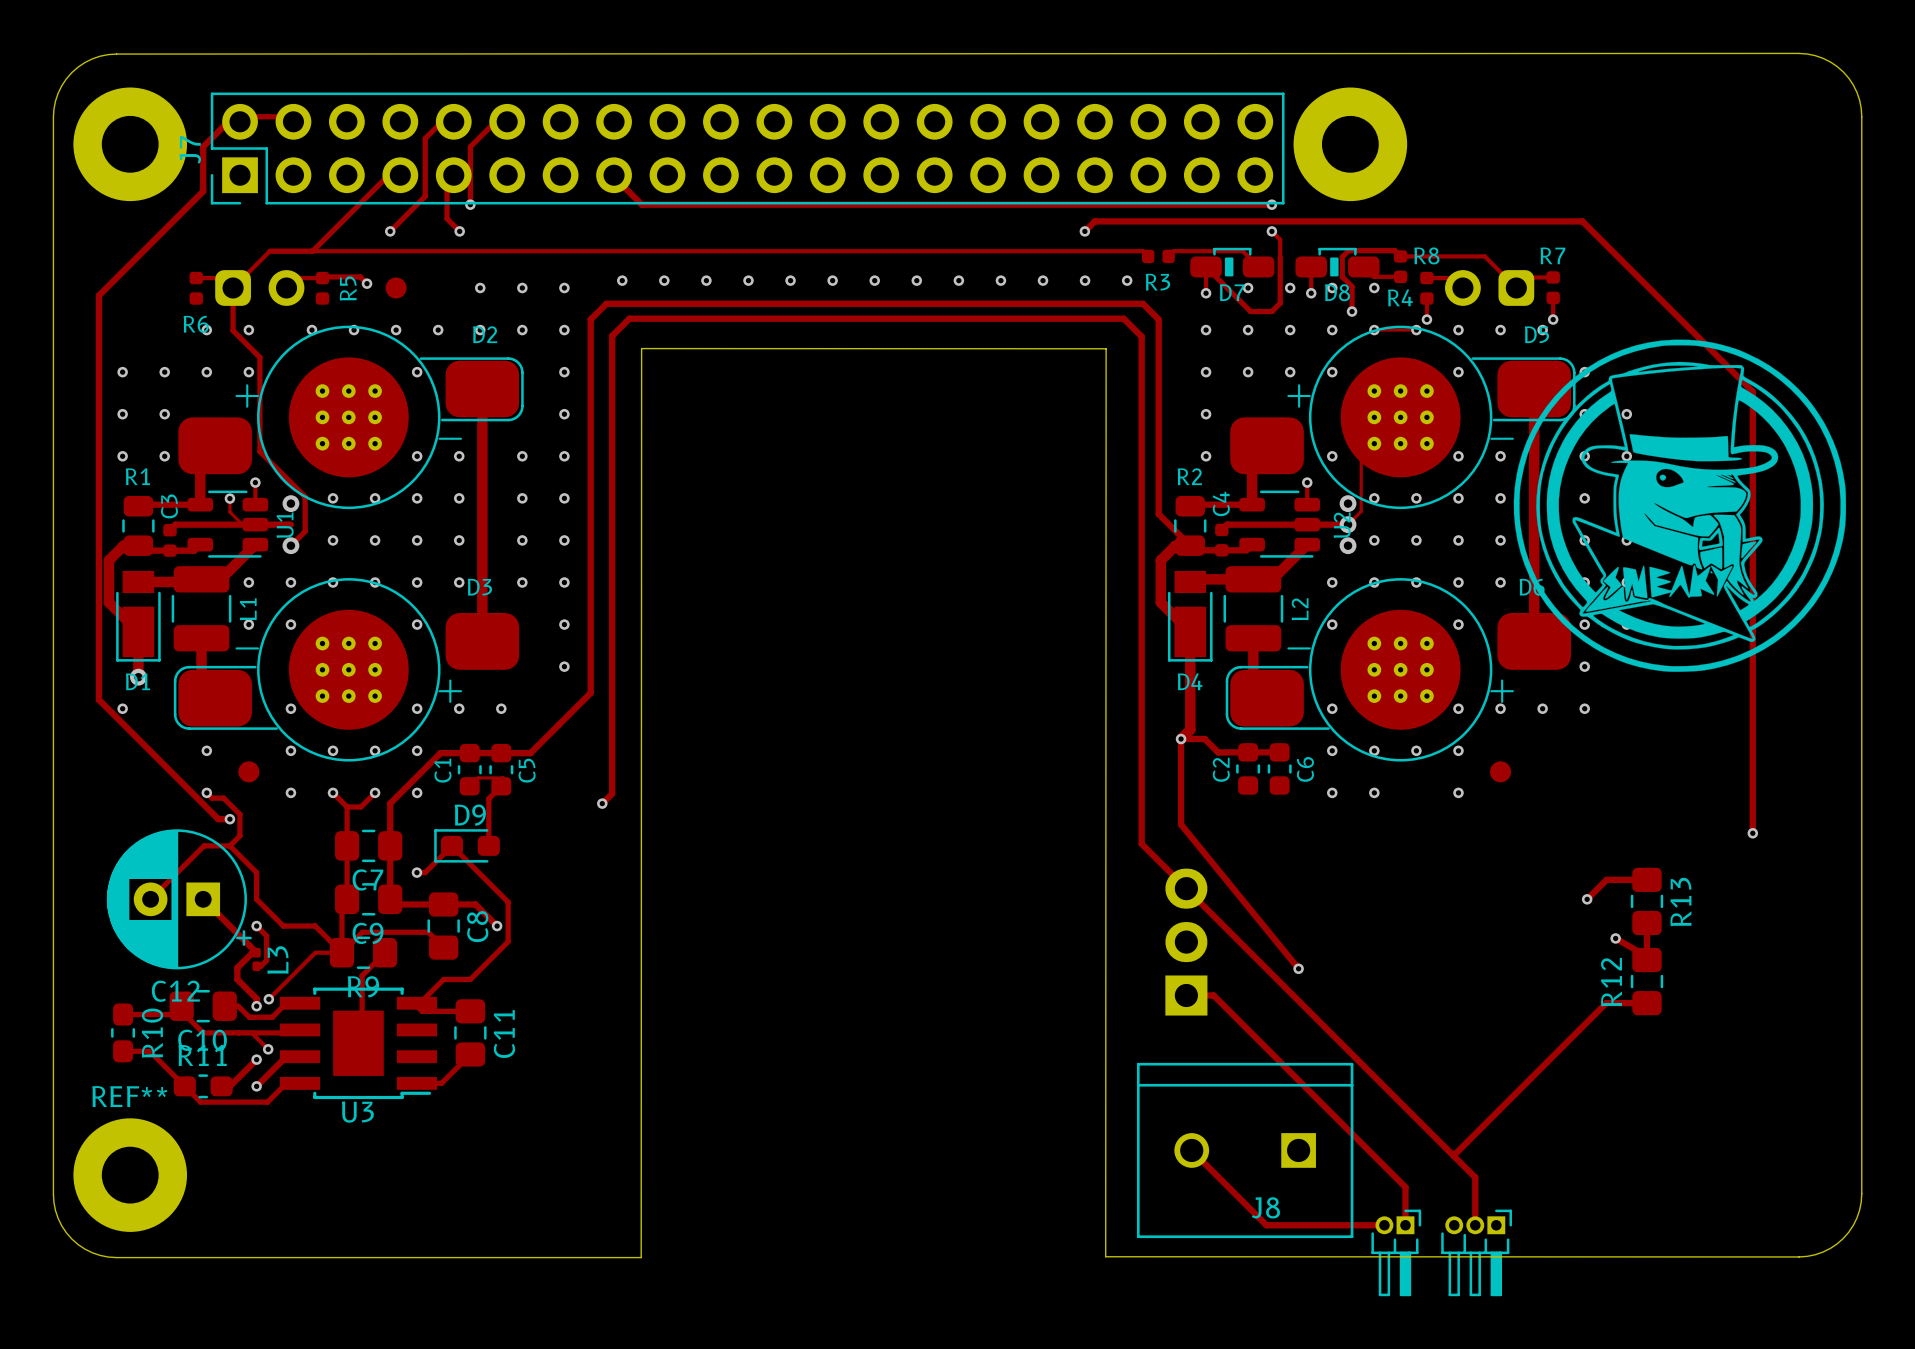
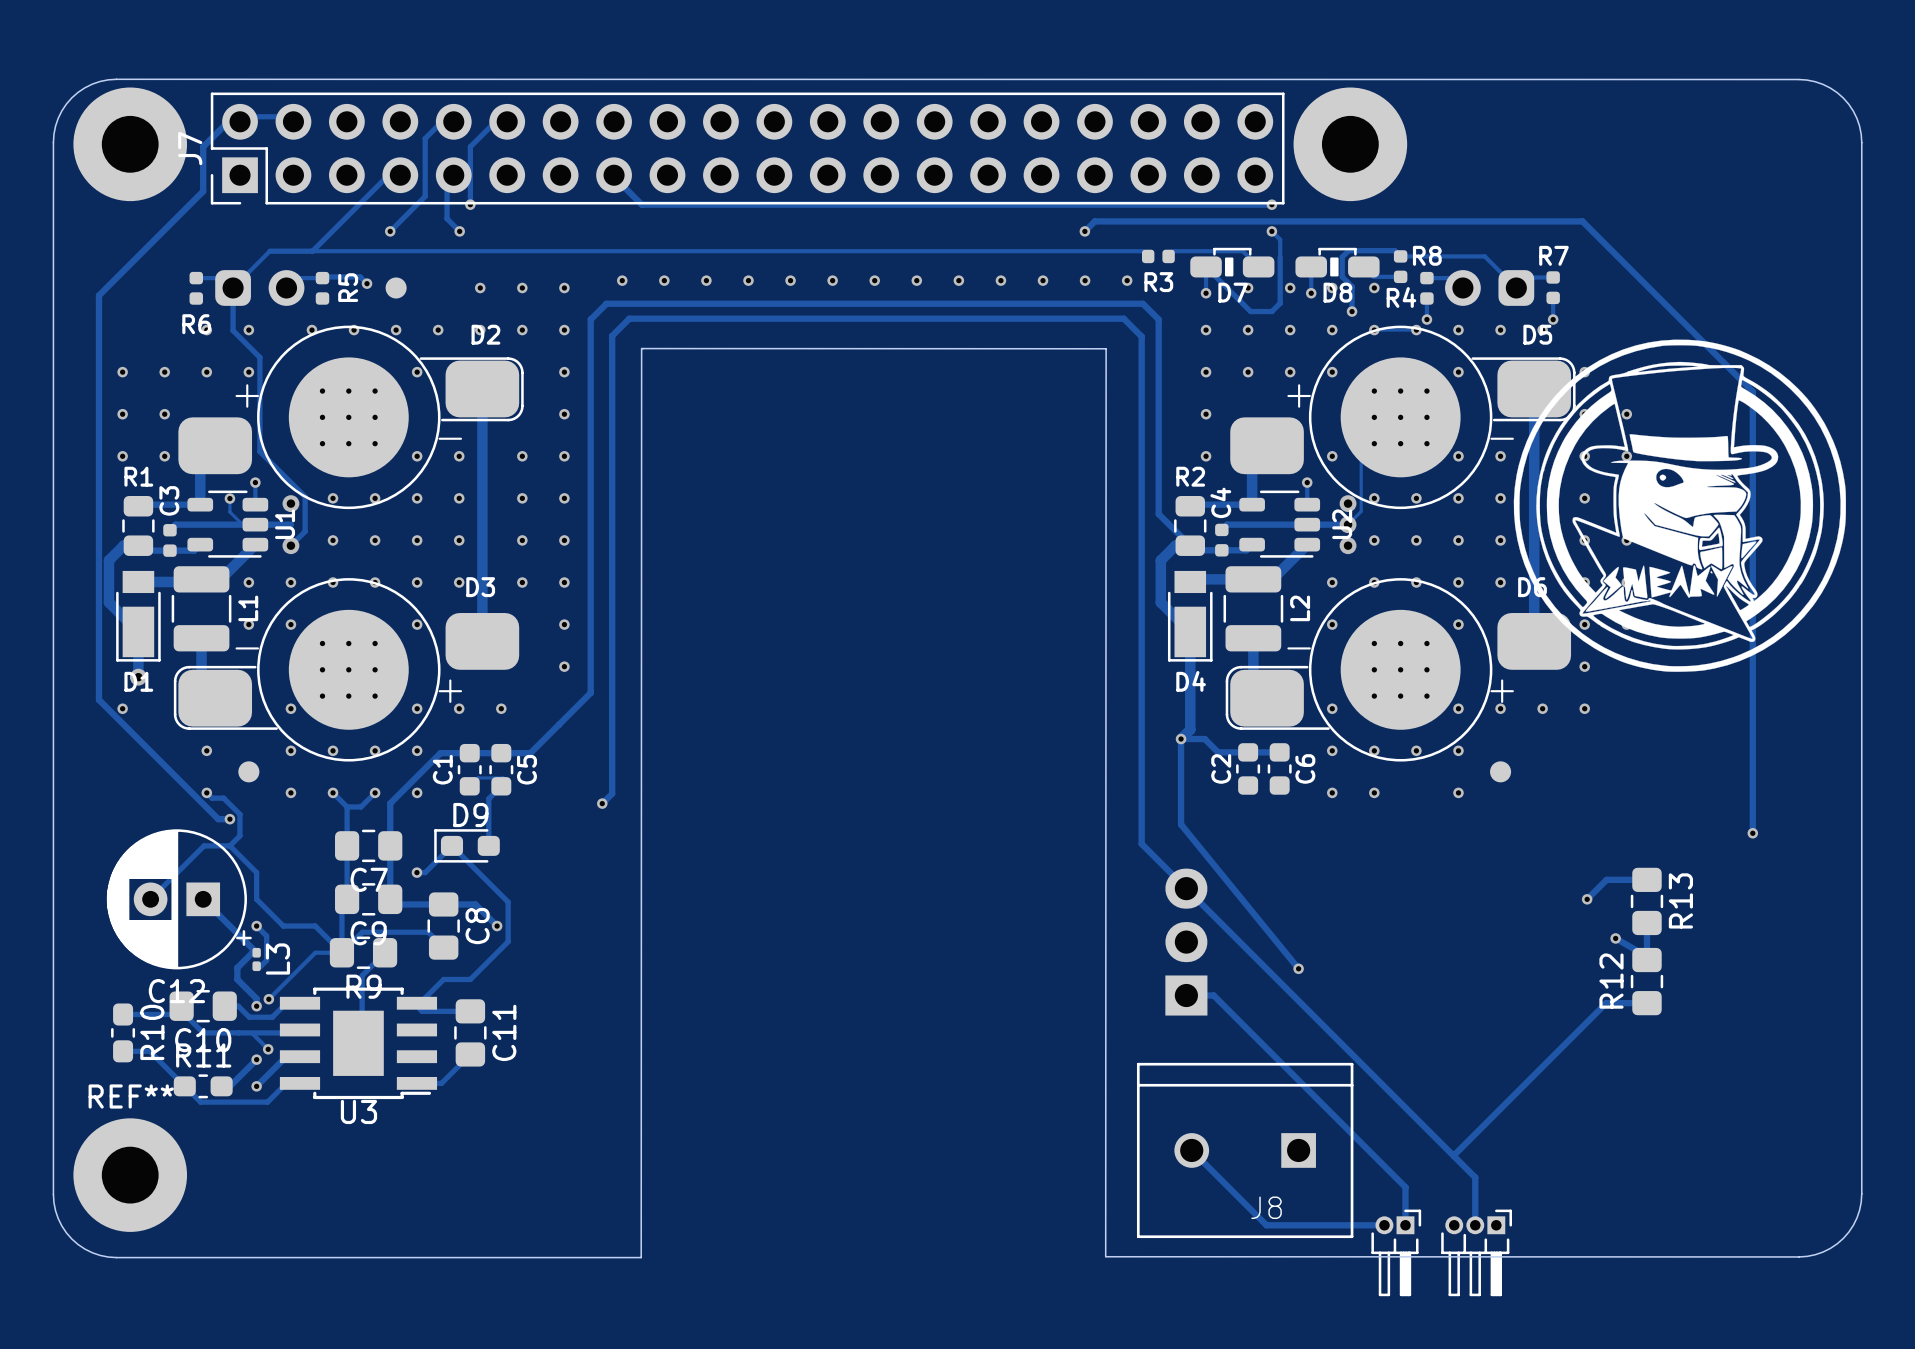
board edge: (53, 142) (55, 100) (66, 78) (78, 67) (92, 58) (116, 54) (1798, 53) (1815, 55) (1830, 61) (1848, 78) (1859, 100) (1861, 142) -> (53, 142) (58, 118) (71, 97) (92, 84) (116, 79) (1798, 79) (1822, 84) (1843, 98) (1856, 118) (1861, 142)

